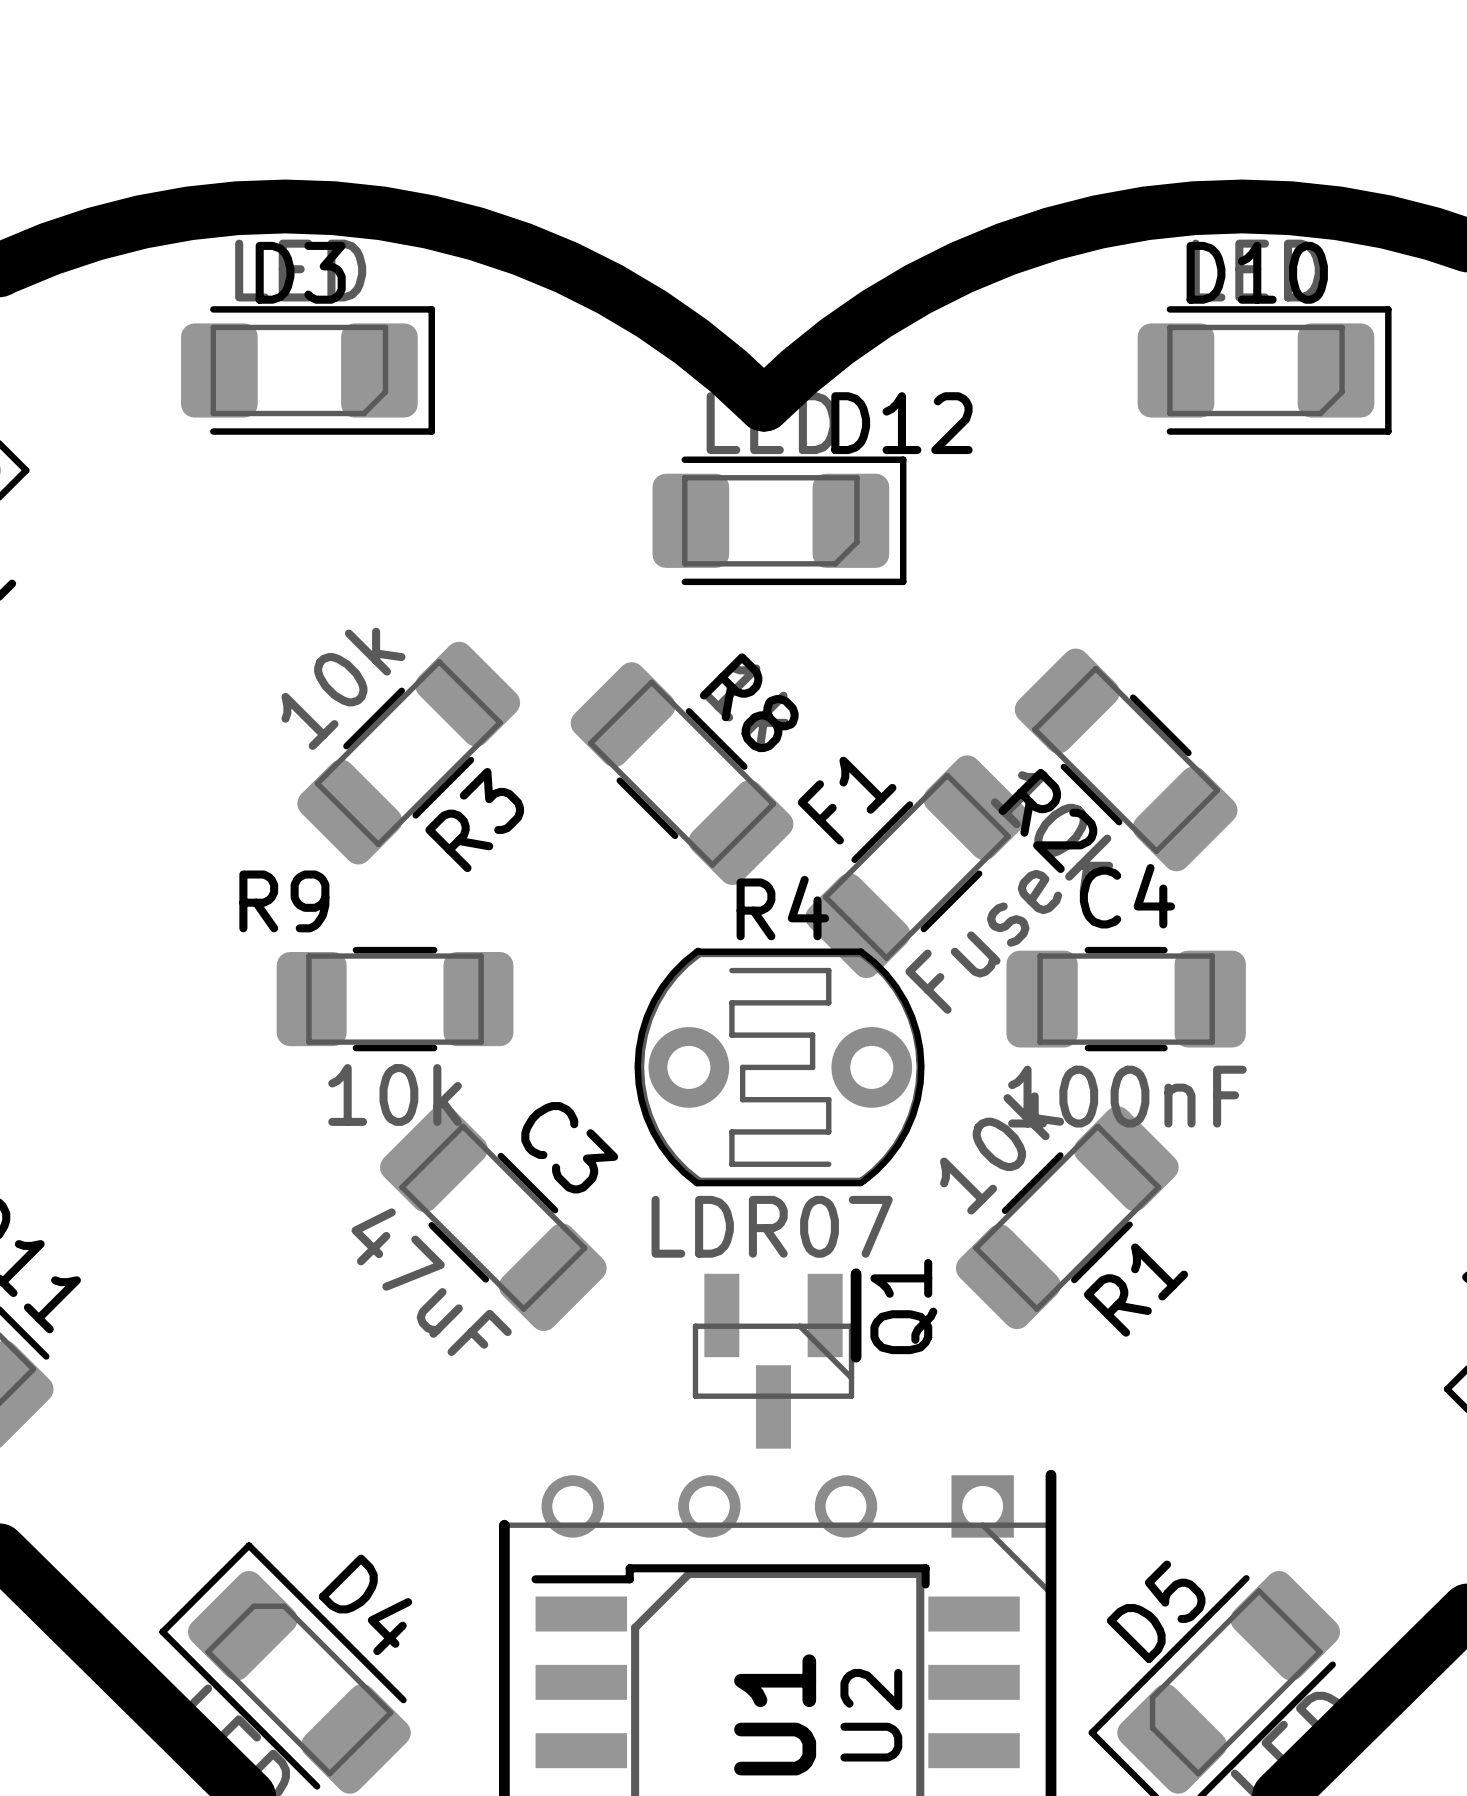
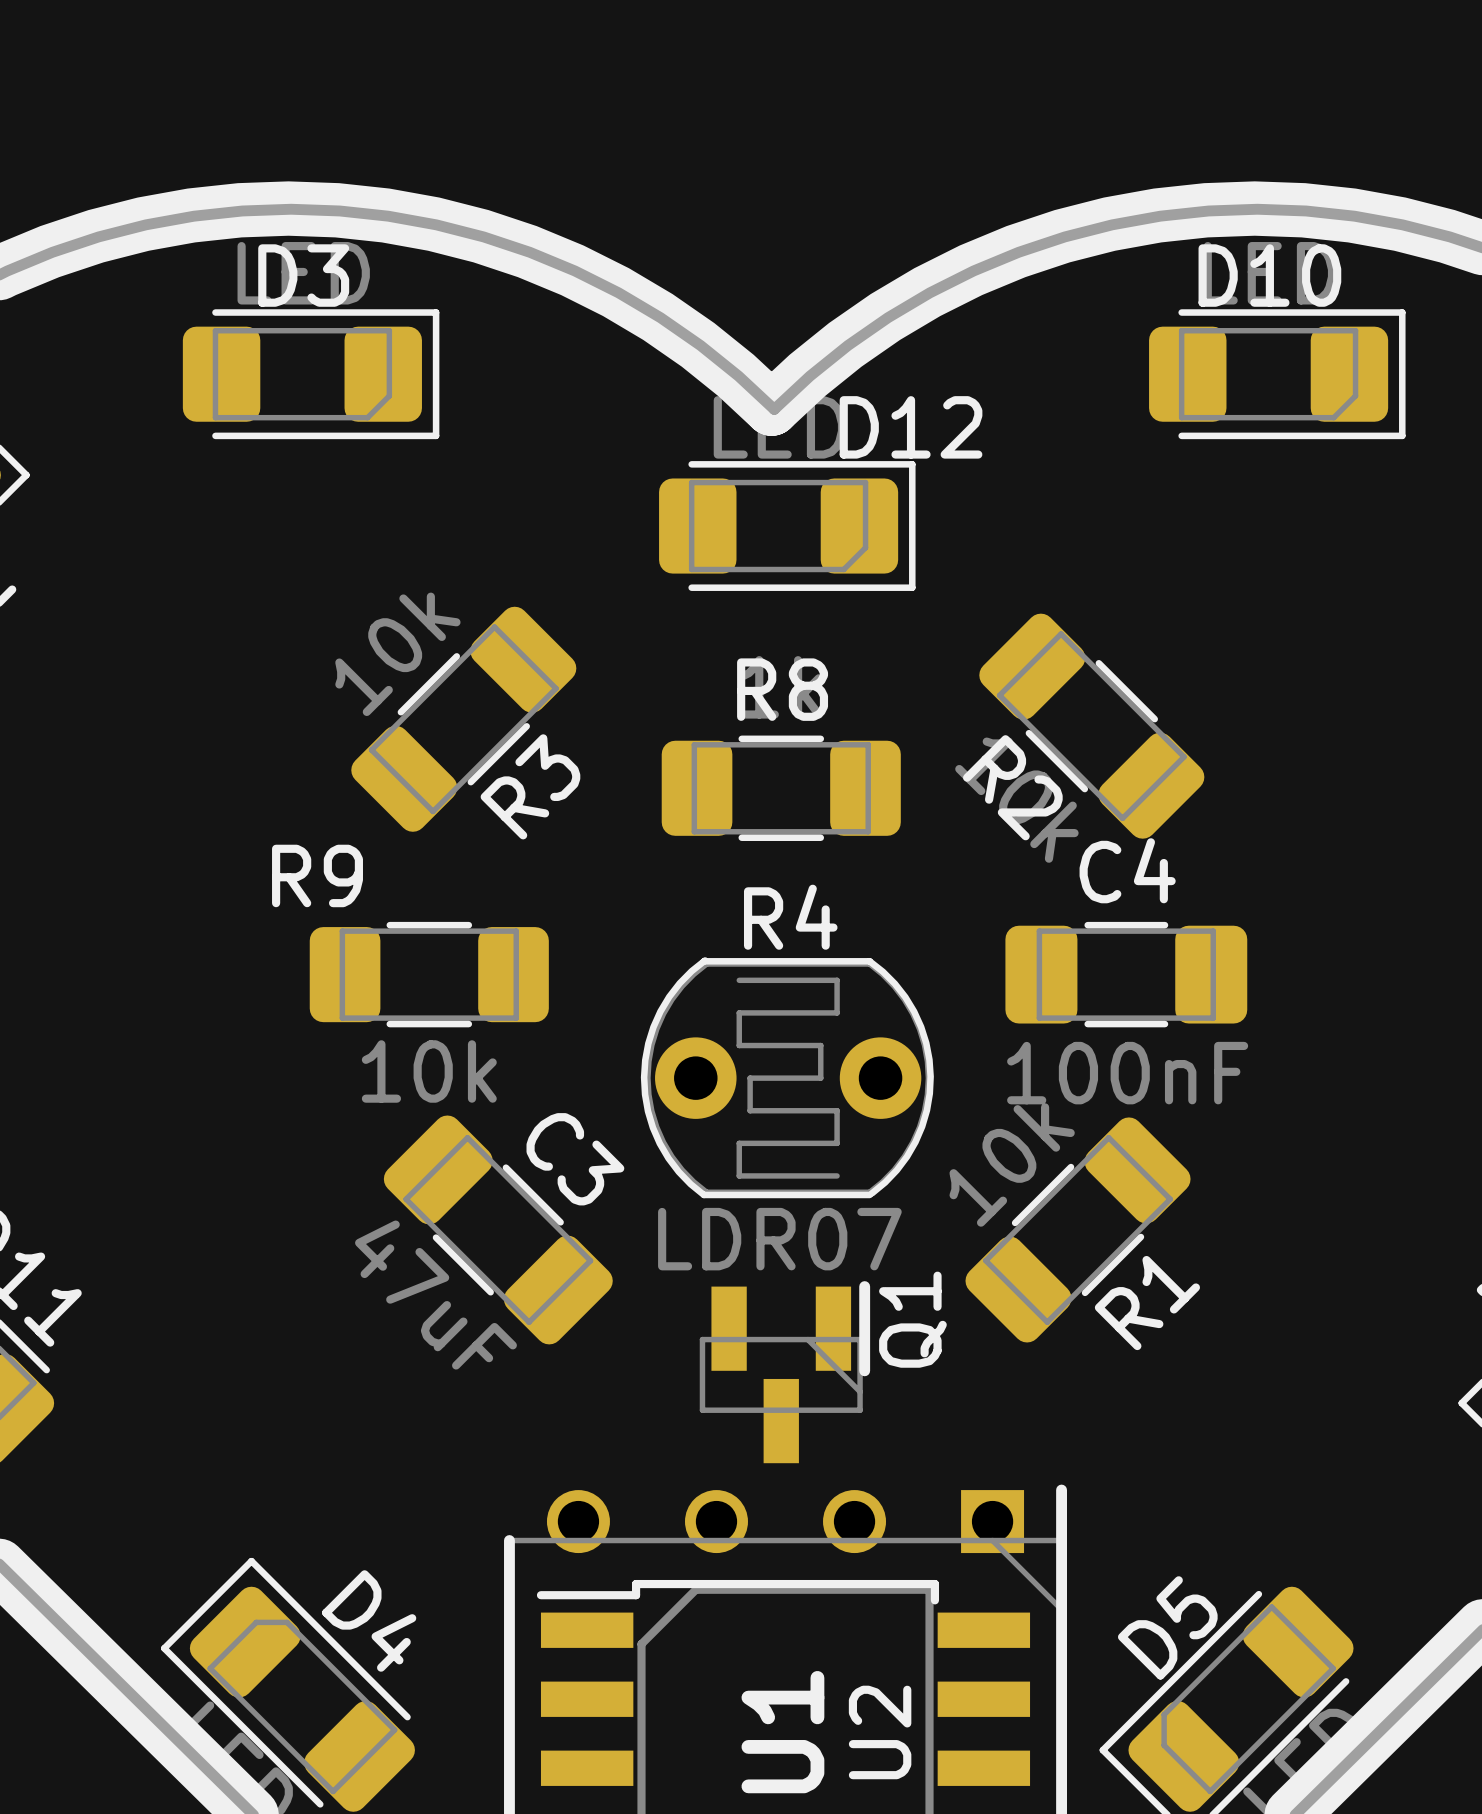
R3 position: (408, 753) -> (463, 719)
R2 position: (1126, 759) -> (1091, 726)
R8 rotation: 0° (682, 773) -> 45° counterclockwise (781, 788)
F1: Fuse (916, 866) -> none
R9 position: (395, 999) -> (429, 974)
C4 position: (1126, 999) -> (1126, 974)

